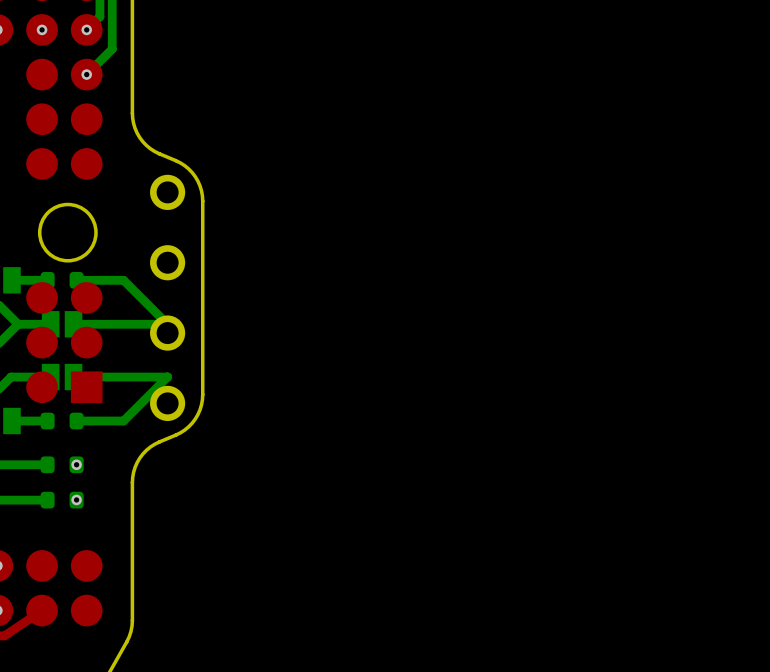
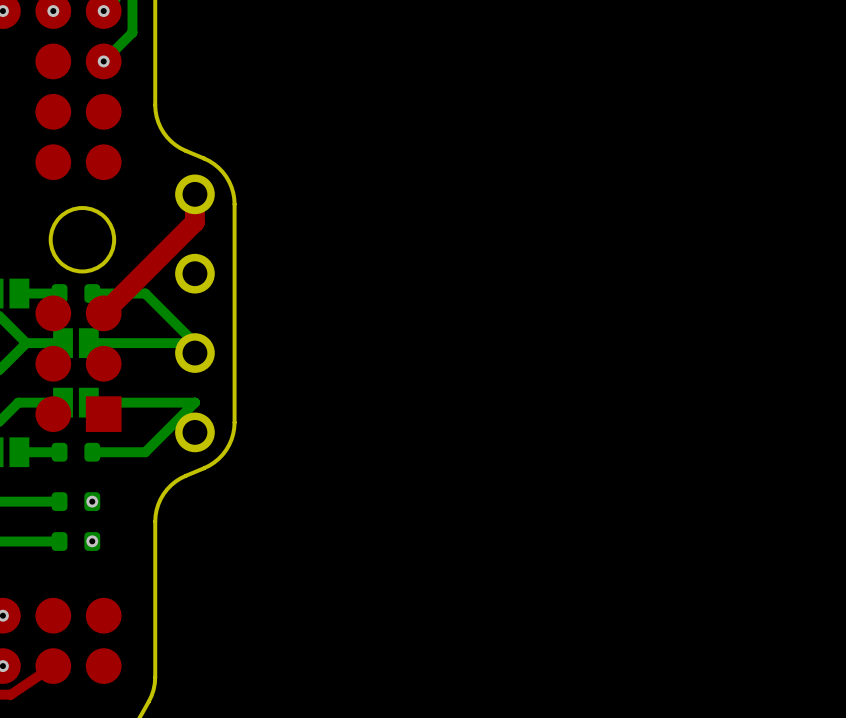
top track: none -> (194, 194) (194, 222) (103, 313)

